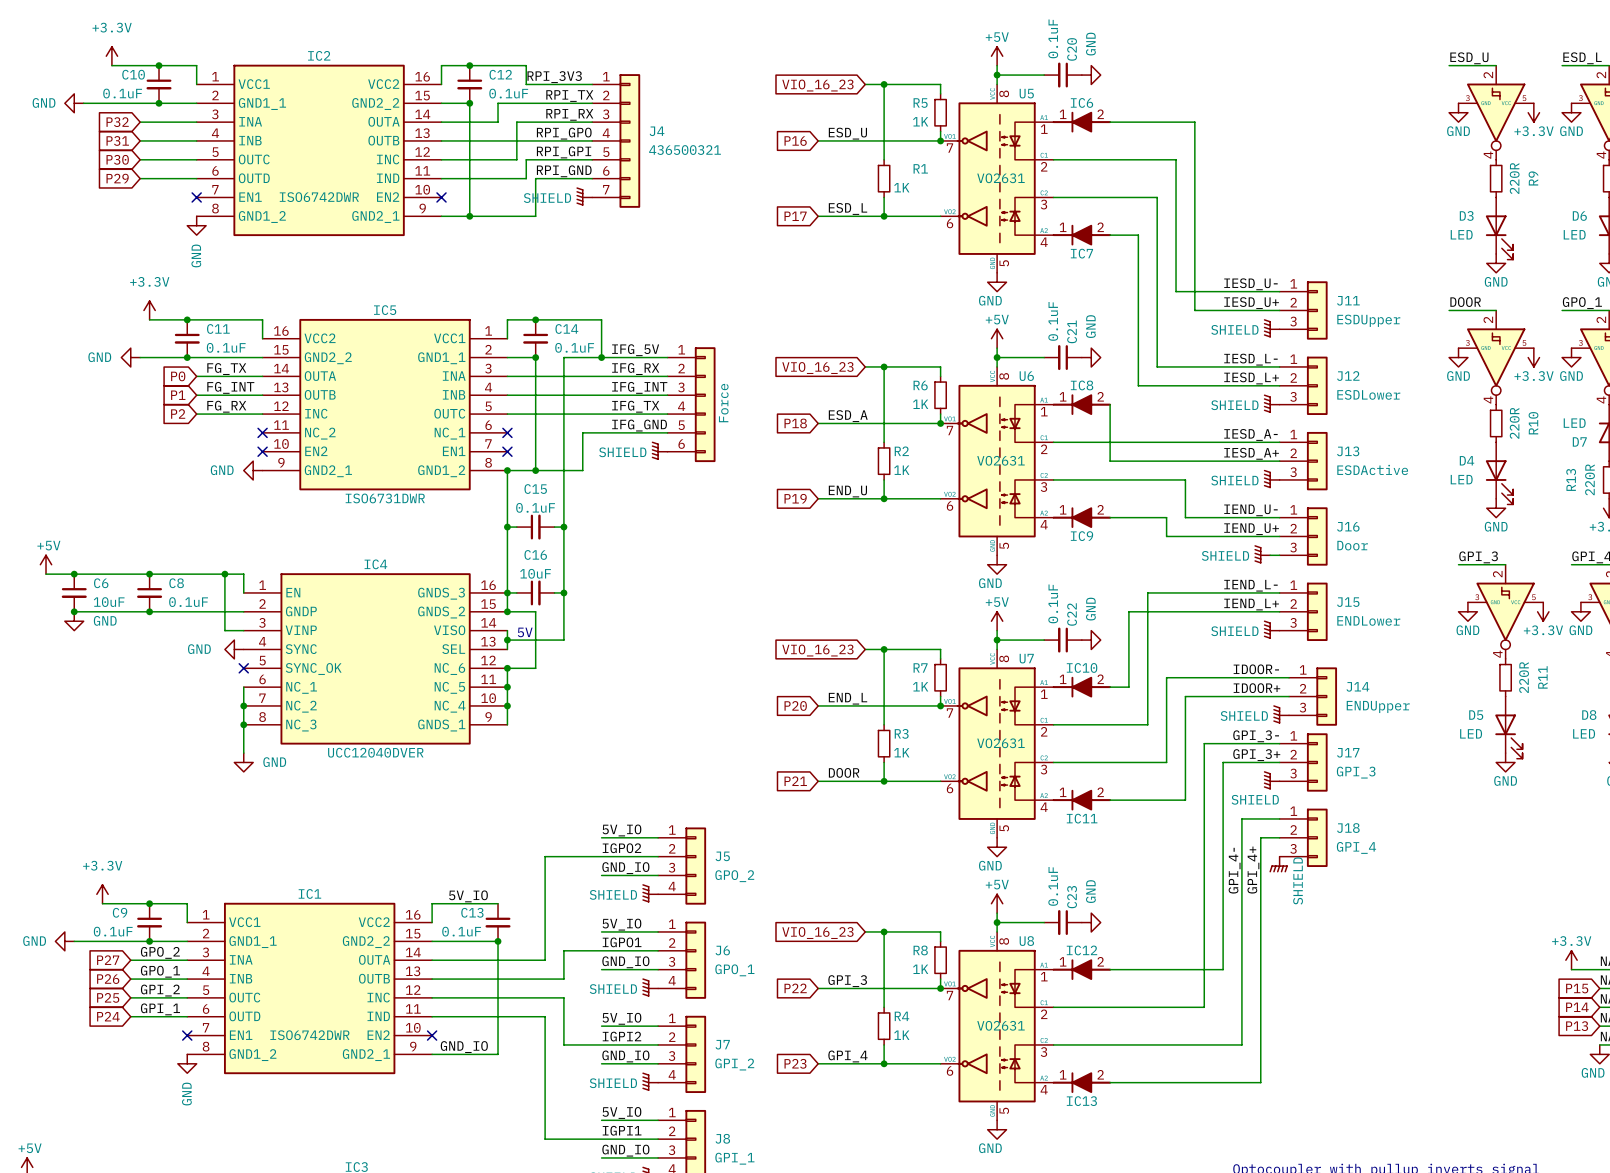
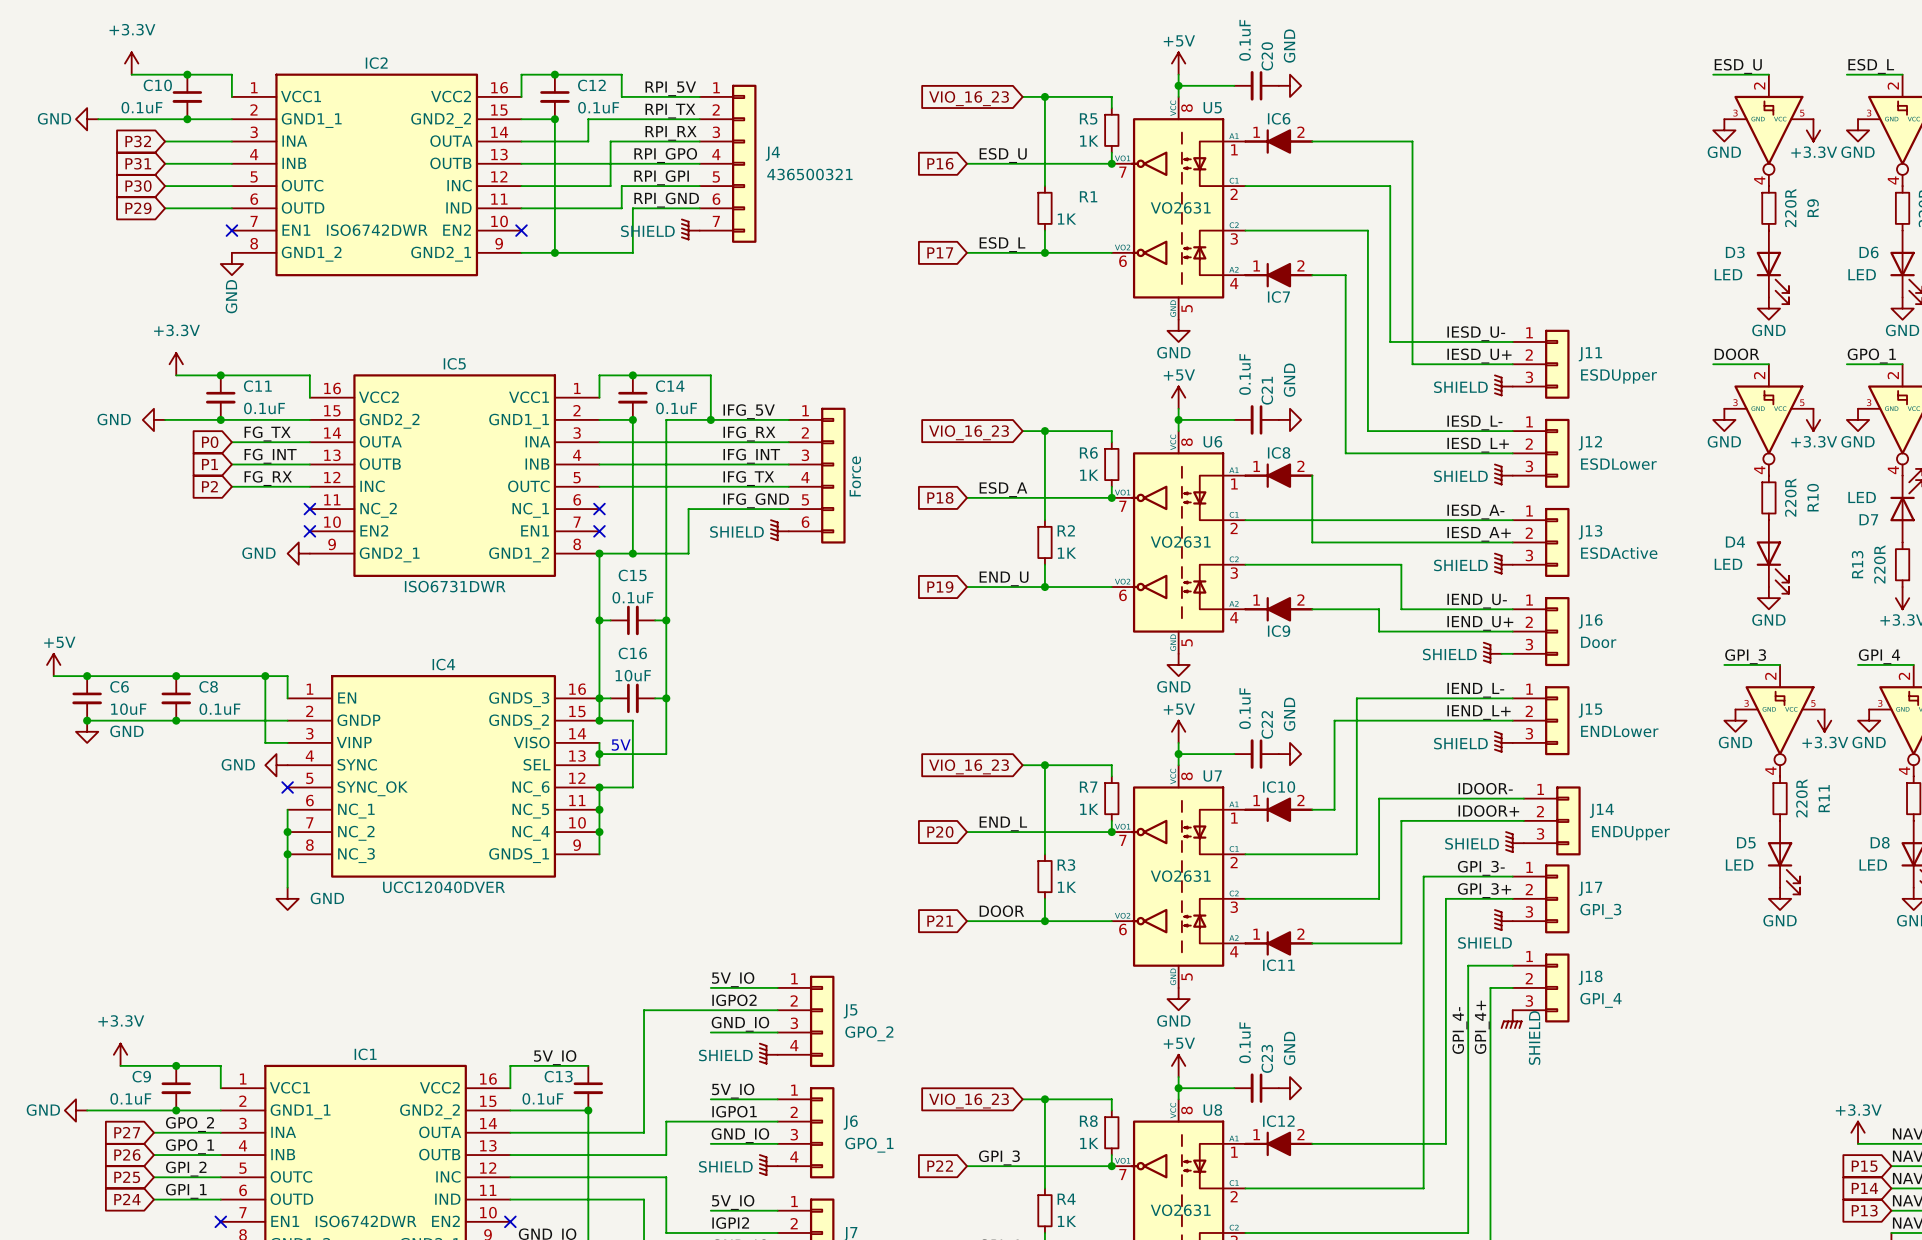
label: RPI_3V3 (554, 77) -> RPI_5V (670, 88)

